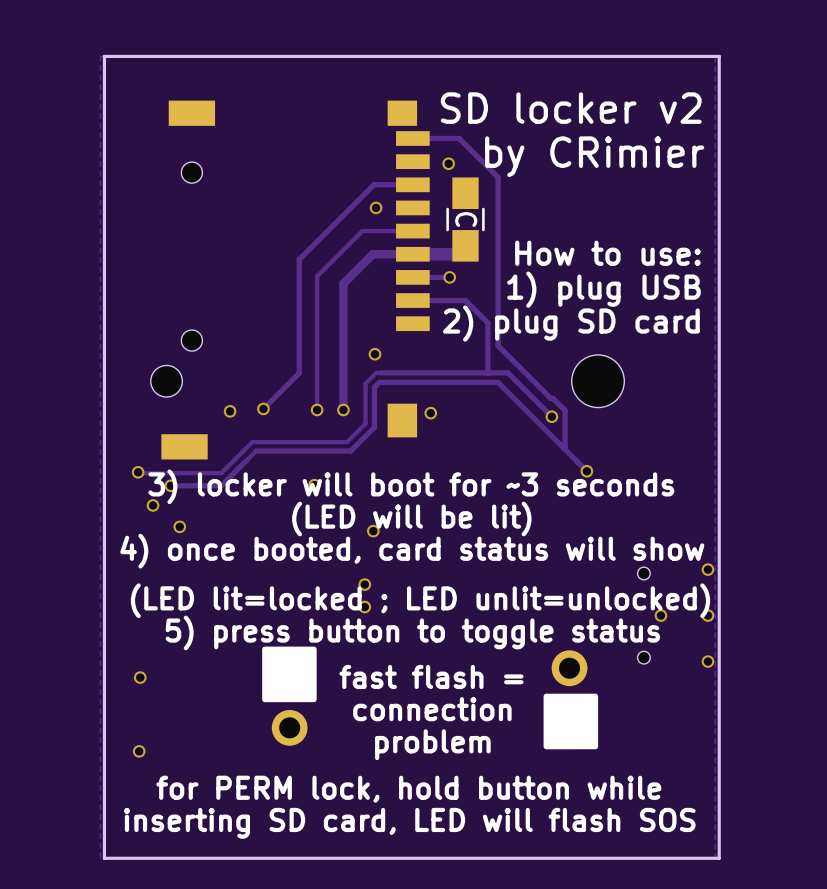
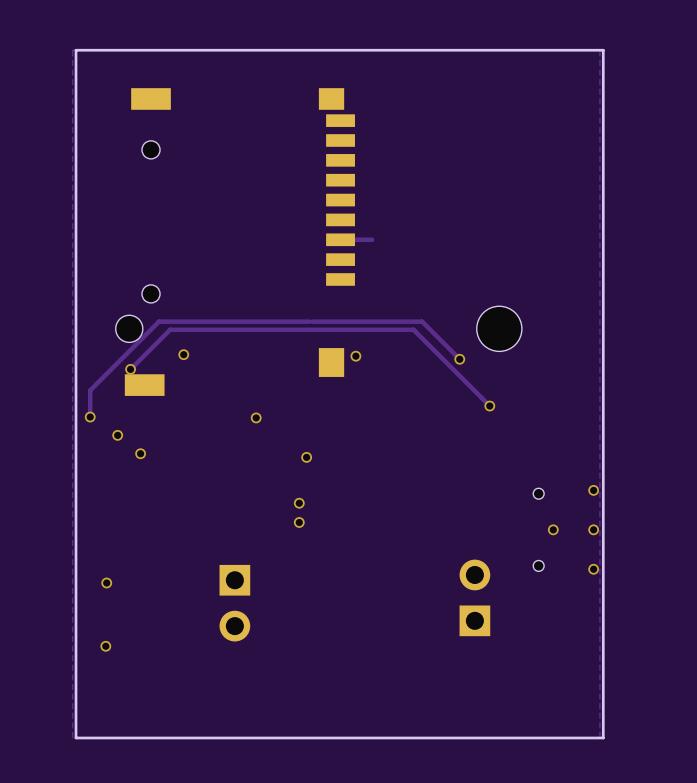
text: SD locker v2 (571, 108) -> none
track: (412, 138) (459, 138) (498, 177) (498, 345) (565, 410) (564, 448) -> none
text: by CRimier (594, 156) -> none
via: (448, 163) -> none
track: (412, 184) (373, 184) (299, 259) (299, 373) (263, 408) -> none
via: (376, 207) -> none
part: (465, 219) -> none
track: (412, 231) (362, 231) (317, 276) (317, 410) -> none
track: (465, 245) (457, 254) (372, 254) (343, 283) (343, 410) -> none
text: How to use: (607, 253) -> none
via: (449, 277) -> none
text: 1) plug USB (603, 289) -> none
track: (412, 300) (465, 300) (487, 322) (487, 372) -> none
text: 2) plug SD card (571, 323) -> none
via: (375, 354) -> none
track: (376, 372) (365, 383) (365, 423) (347, 442) (252, 442) (221, 473) (138, 472) -> (309, 321) (158, 321) (90, 390) (90, 417)
track: (379, 382) (374, 387) (374, 427) (350, 451) (256, 451) (221, 485) (170, 485) -> (311, 329) (170, 329) (130, 369)
via: (263, 408) -> none
via: (317, 410) -> none
via: (343, 410) -> none
via: none -> (130, 369)
via position: (138, 472) -> (90, 417)
via: (170, 485) -> none
text: 3) locker will boot for ~3 seconds (411, 486) -> none
text: (LED will be lit) (411, 518) -> none
text: 4) once booted, card status will show (412, 551) -> none
text: (LED lit=locked ; LED unlit=unlocked) (420, 600) -> none
text: 5) press button to toggle status (412, 632) -> none
drawing: [262, 646, 317, 703] -> none
text: fast flash = (431, 676) -> none
drawing: [543, 693, 599, 750] -> none
text: connection (432, 709) -> none
text: problem (432, 744) -> none
text: for PERM lock, hold button while (408, 789) -> none
text: inserting SD card, LED will flash SOS (409, 823) -> none

